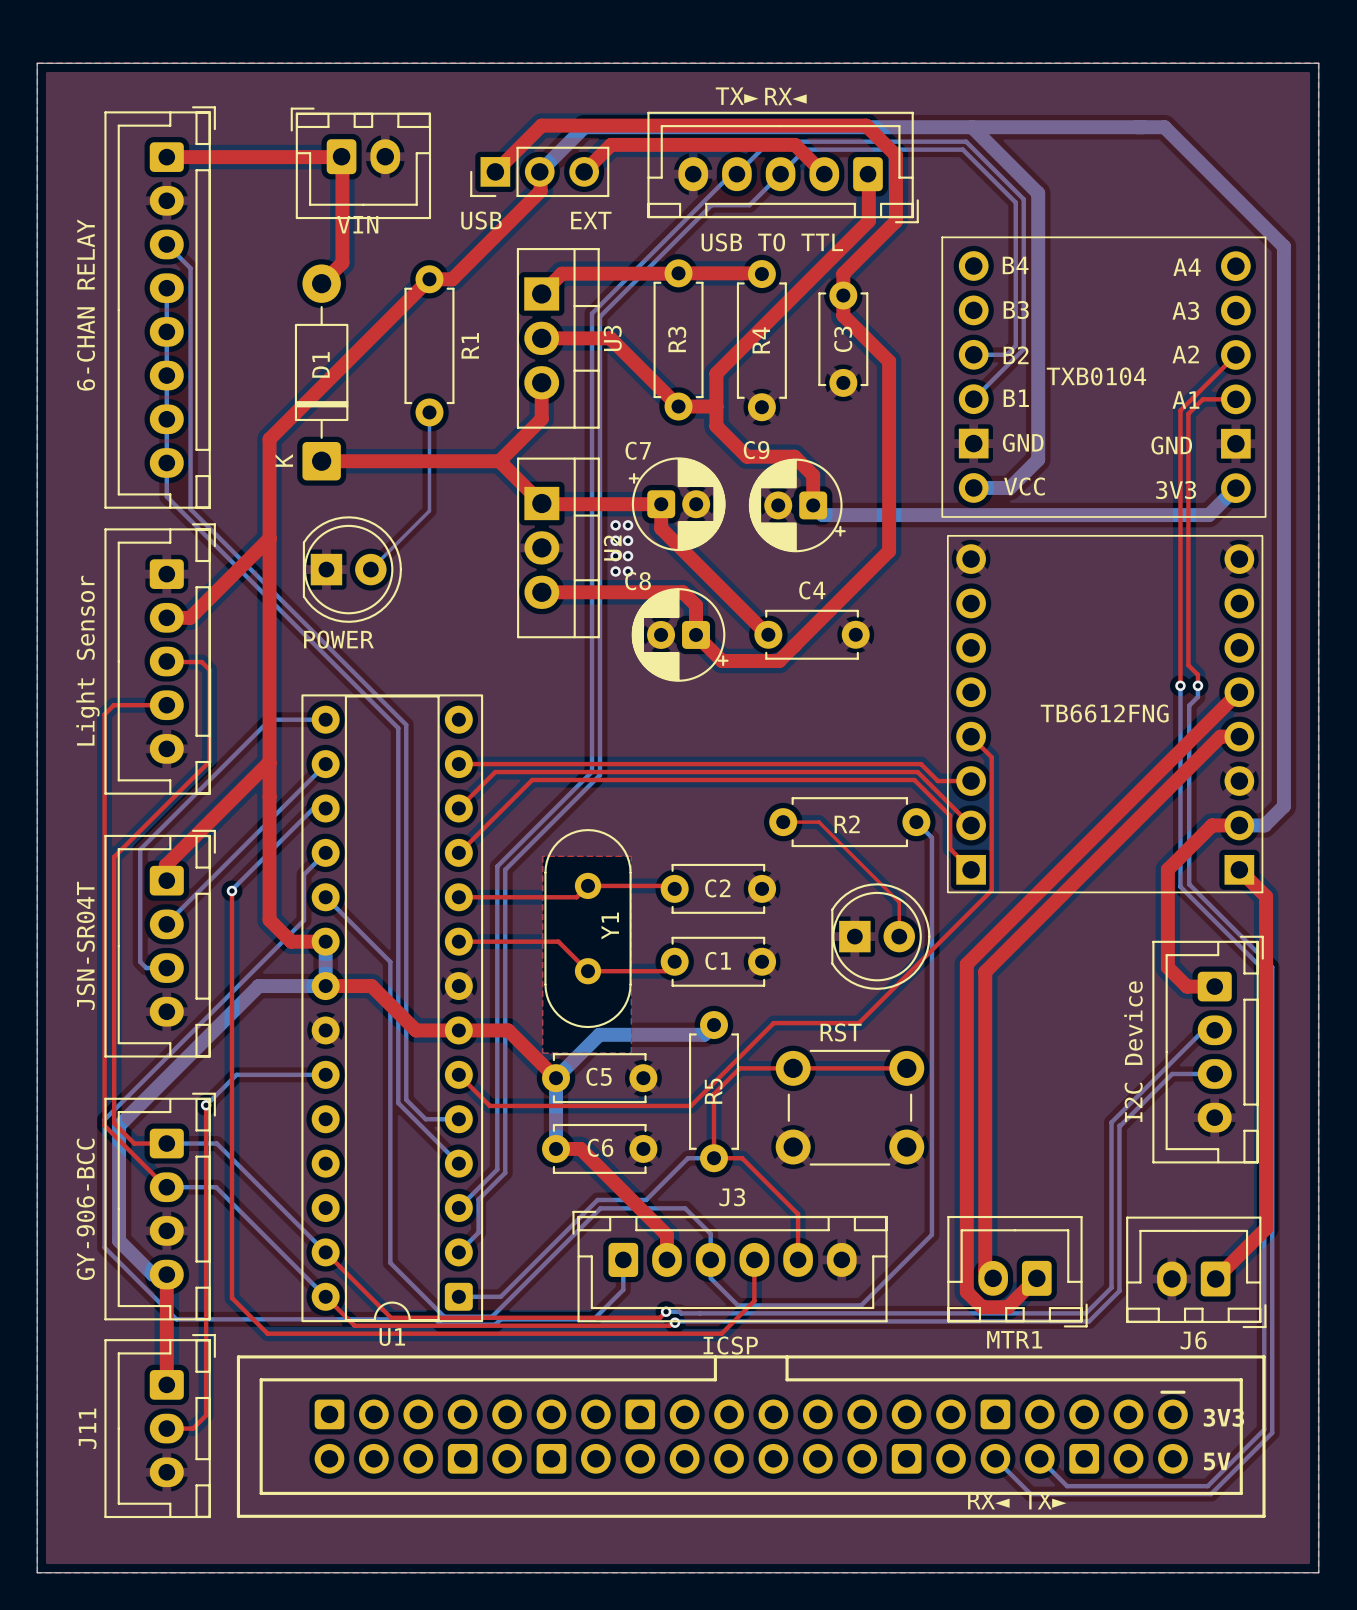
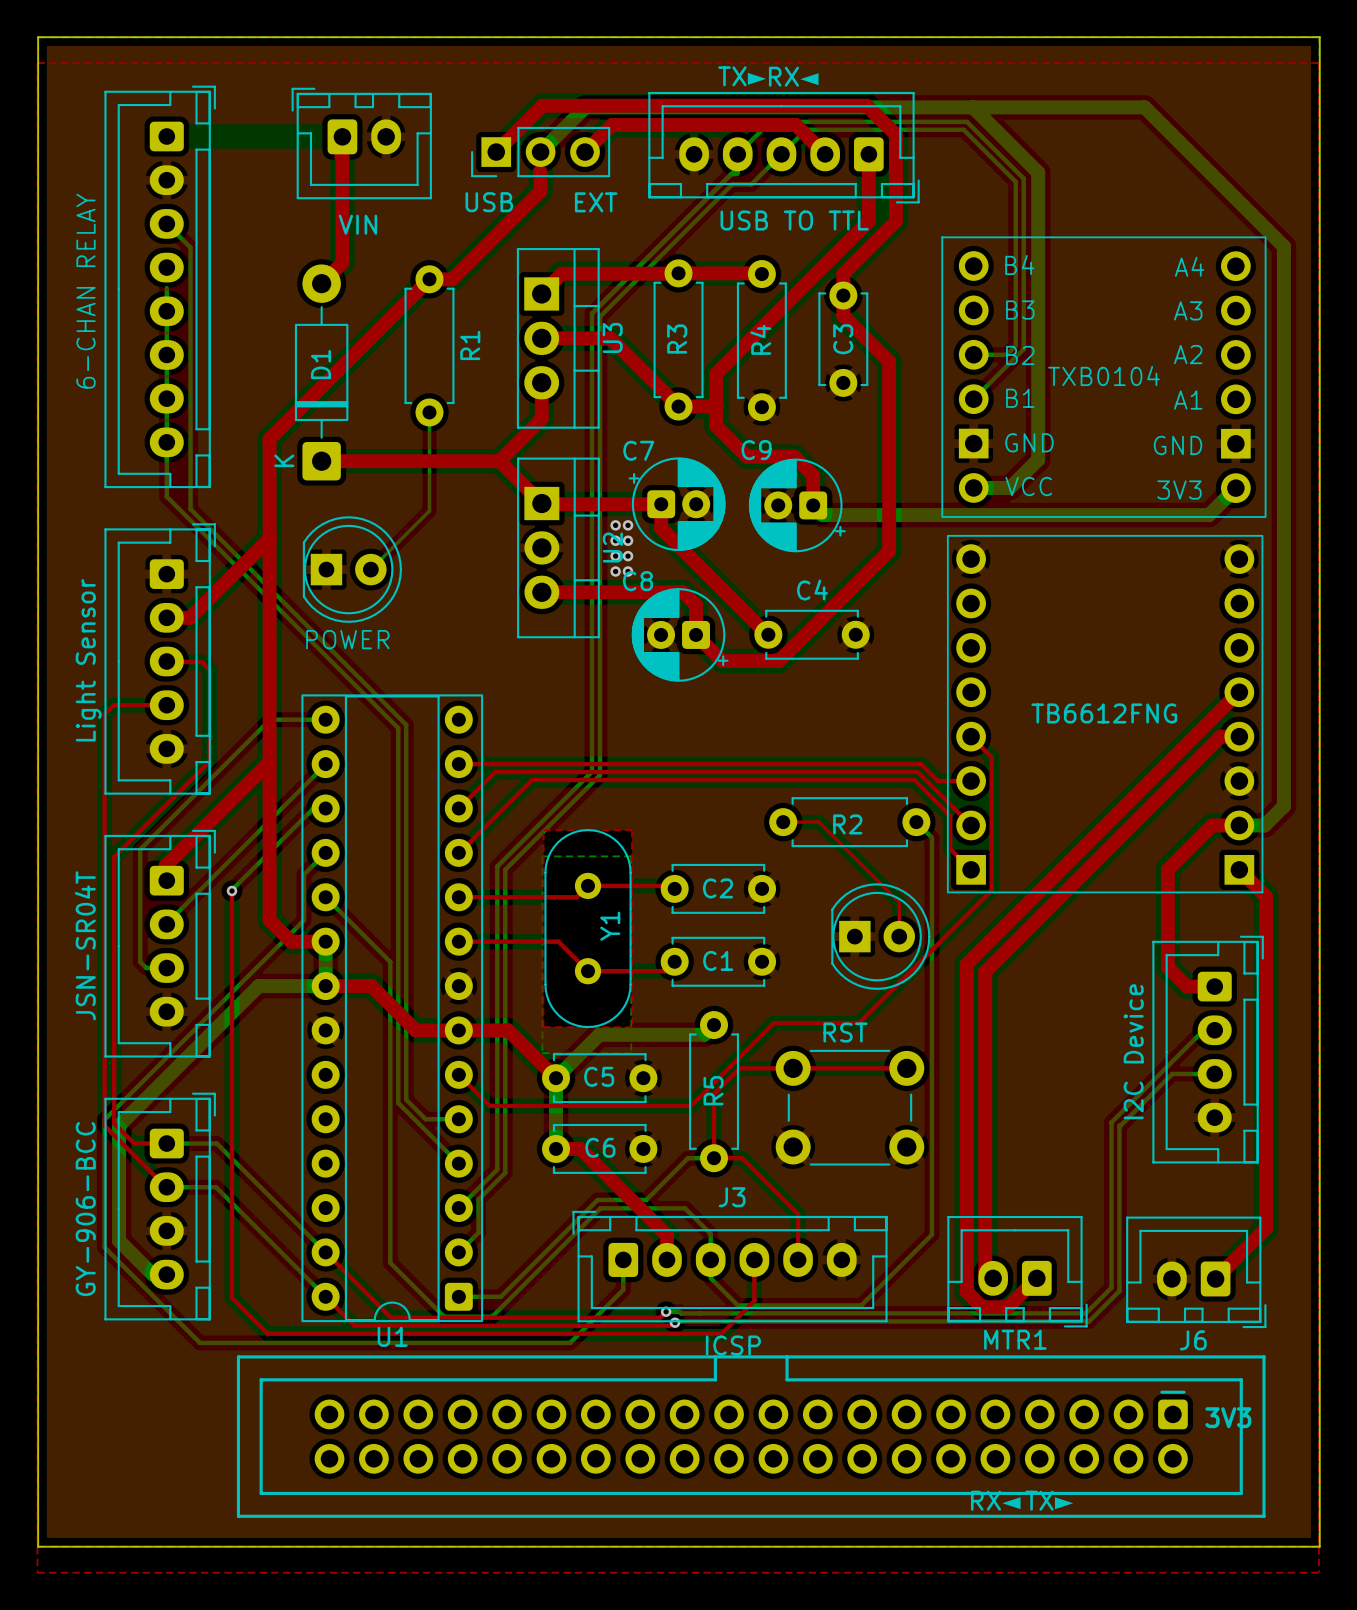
board edge: (37, 63) (1318, 63) (1318, 1572) (37, 1572) (37, 63) -> (38, 37) (1319, 37) (1319, 1546) (38, 1546) (38, 37)
text position: TX► (737, 96) -> TX► (742, 76)
text position: RX◄ (785, 96) -> RX◄ (794, 76)
bottom track: (972, 127) (1038, 193) -> (972, 107) (1038, 172) (1038, 193)
bottom track: (1164, 127) (584, 127) (539, 171) -> (1164, 127) (1144, 107) (585, 107) (540, 152)
top track: (895, 155) (866, 125) (541, 125) (495, 171) -> (895, 155) (895, 134) (867, 105) (542, 105) (496, 152)
top track: (342, 156) (166, 157) -> none
part position: (360, 163) -> (361, 143)
part position: (783, 167) -> (784, 147)
part position: (539, 171) -> (540, 152)
top track: (584, 171) (611, 144) (794, 144) (824, 174) -> (585, 152) (612, 125) (795, 125) (825, 154)
bottom track: (736, 187) (736, 174) (769, 141) (966, 141) (1023, 199) -> (592, 313) (737, 167) (737, 154) (770, 121) (966, 121) (1023, 178) (1023, 199)
bottom track: (1015, 202) (962, 149) (805, 149) (749, 205) (711, 205) -> (1015, 202) (1015, 181) (963, 129) (805, 129) (751, 184) (732, 184) (711, 205)
text position: USB (481, 220) -> USB (489, 202)
text position: EXT (591, 220) -> EXT (596, 202)
text position: USB TO TTL (772, 242) -> USB TO TTL (794, 220)
bottom track: (166, 244) (190, 268) -> (166, 223) (190, 247) (190, 268)
part position: (160, 307) -> (160, 286)
top track: (1235, 355) (1180, 410) (1180, 685) -> none
top track: (1235, 399) (1202, 399) (1188, 413) (1188, 665) (1197, 674) (1197, 685) -> none
bottom track: (1180, 685) (1180, 886) (1264, 970) (1264, 1429) (1207, 1486) (1067, 1486) (1039, 1458) -> none
via: (1180, 685) -> none
bottom track: (1197, 685) (1197, 696) (1189, 705) (1189, 884) (1272, 967) (1272, 1432) (1211, 1494) (1030, 1494) (995, 1458) -> none
via: (1197, 685) -> none
top zone outline: (542, 856) (542, 1053) (631, 1053) (631, 856) (542, 856) -> (543, 830) (543, 1027) (632, 1027) (632, 830) (543, 830)
bottom track: (325, 1074) (236, 1074) (206, 1105) -> none
top track: (206, 1105) (206, 1415) (193, 1428) (166, 1428) -> none
via: (206, 1105) -> none
top track: (166, 1274) (166, 1384) -> none
bottom track: (176, 1319) (435, 1319) (440, 1324) (495, 1324) (500, 1319) (593, 1319) -> (176, 1319) (200, 1342) (570, 1342) (593, 1319)
part footprint: [236, 1355, 1266, 1518] -> [236, 1355, 1266, 1518]
J11: (160, 1426) -> none
text: 5V (1217, 1461) -> none

